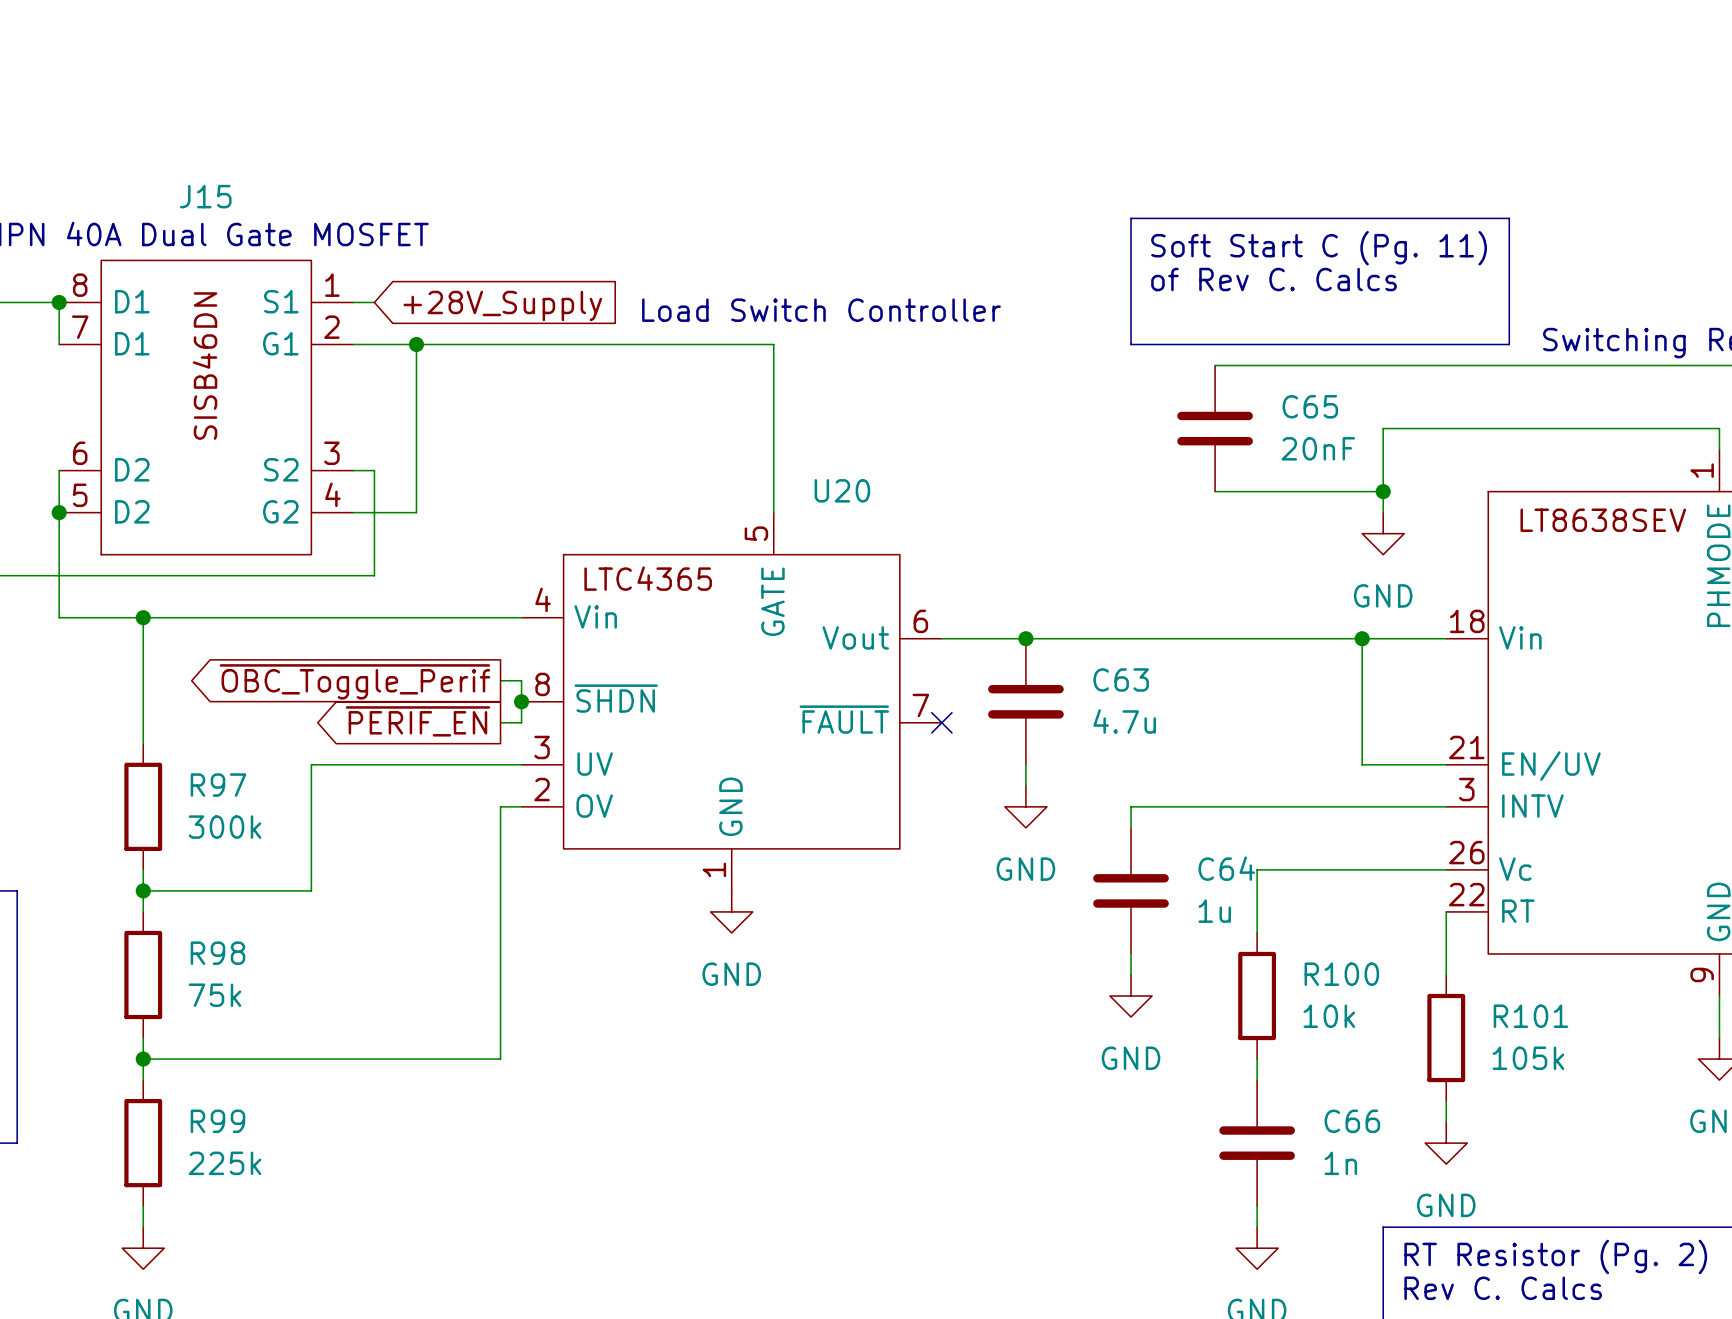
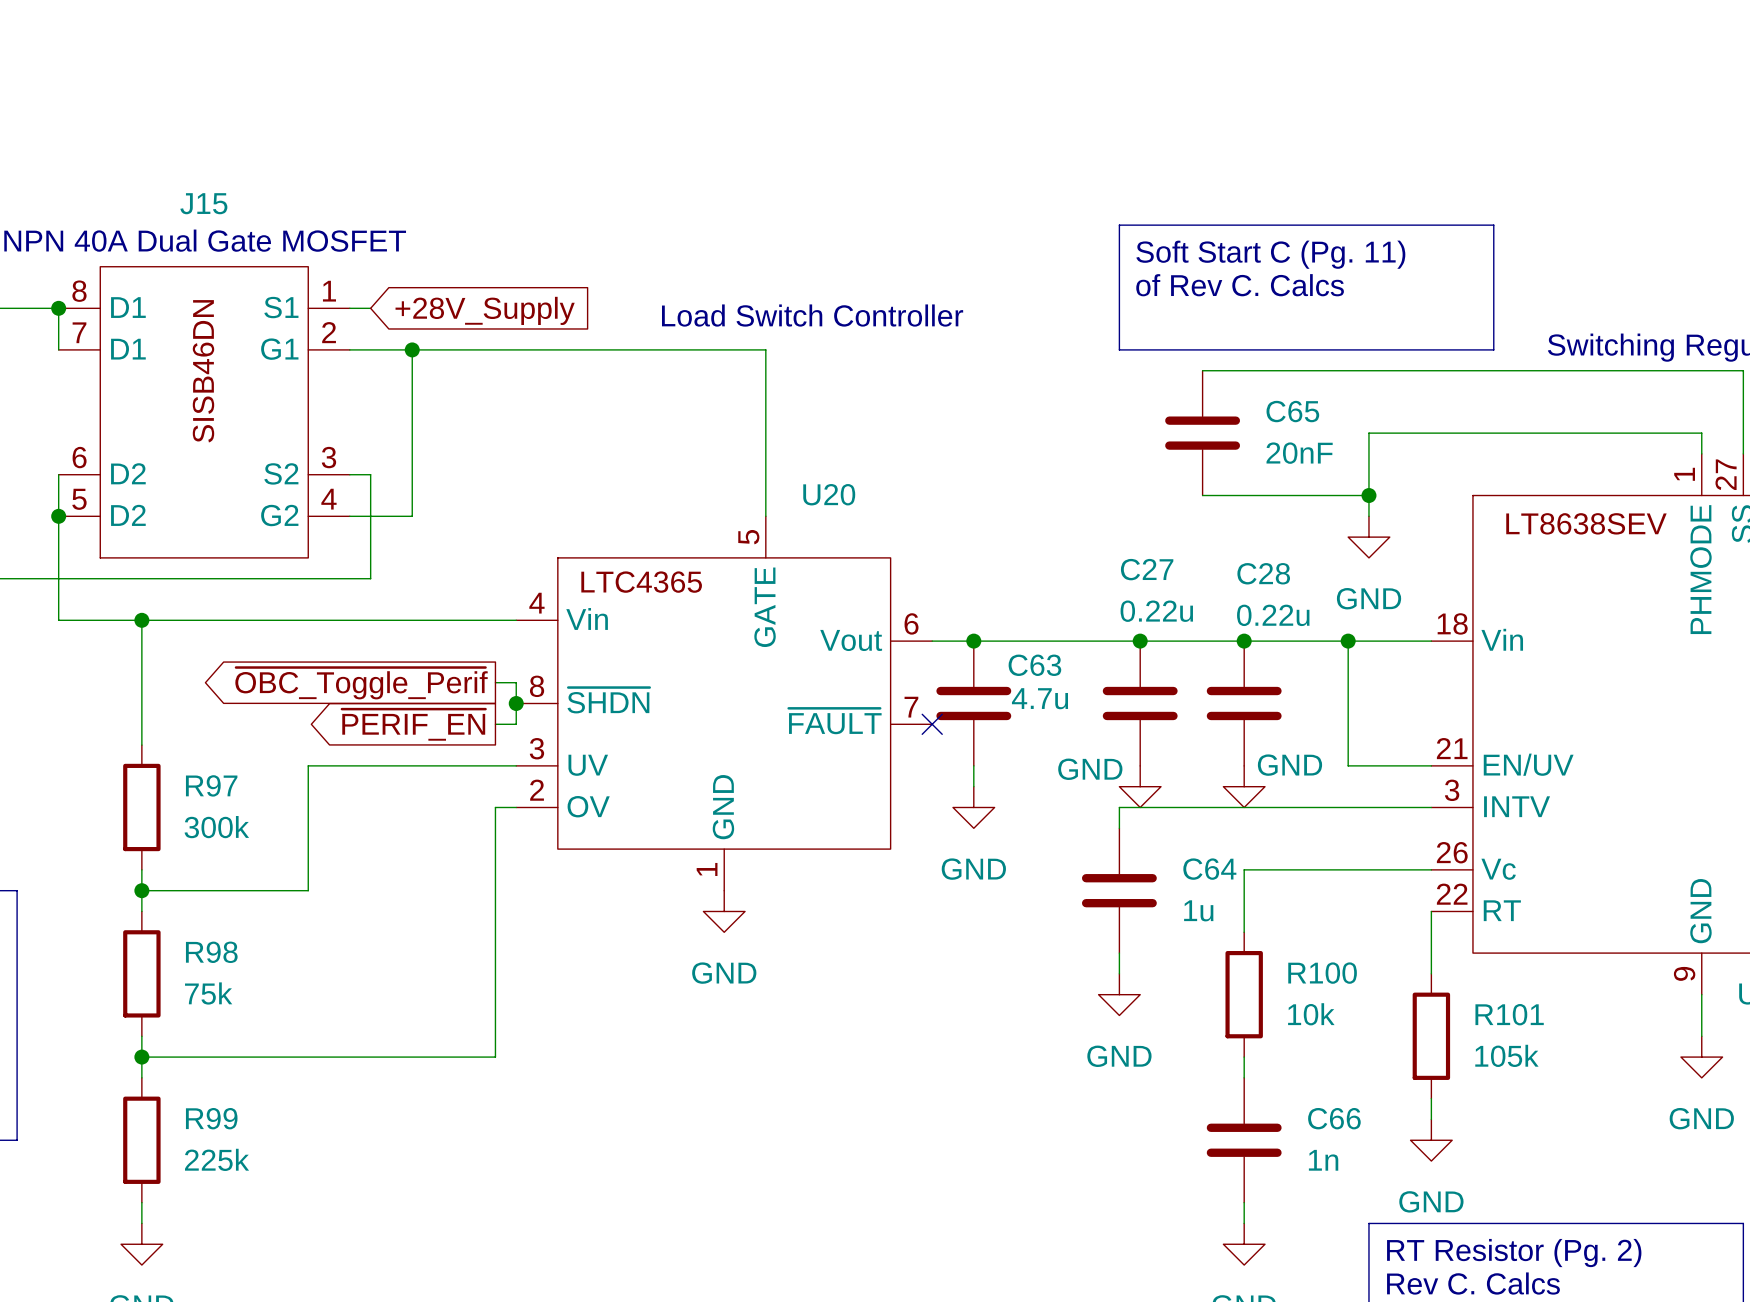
junction position: (1025, 638) -> (973, 641)
junction: none -> (1140, 641)
junction: none -> (1244, 641)
C63 name position: C63 (1121, 679) -> C63 (1034, 665)
C63 position: (1025, 701) -> (973, 703)
C27: none -> 0.22u (1140, 703)
C28: none -> 0.22u (1244, 703)
C63 value position: 4.7u (1124, 721) -> 4.7u (1040, 698)
wire: (1025, 764) (1025, 785) -> (973, 765) (973, 786)
power symbol: none -> GND (1140, 786)
power symbol: none -> GND (1244, 786)
power symbol position: GND (1025, 806) -> GND (973, 807)

